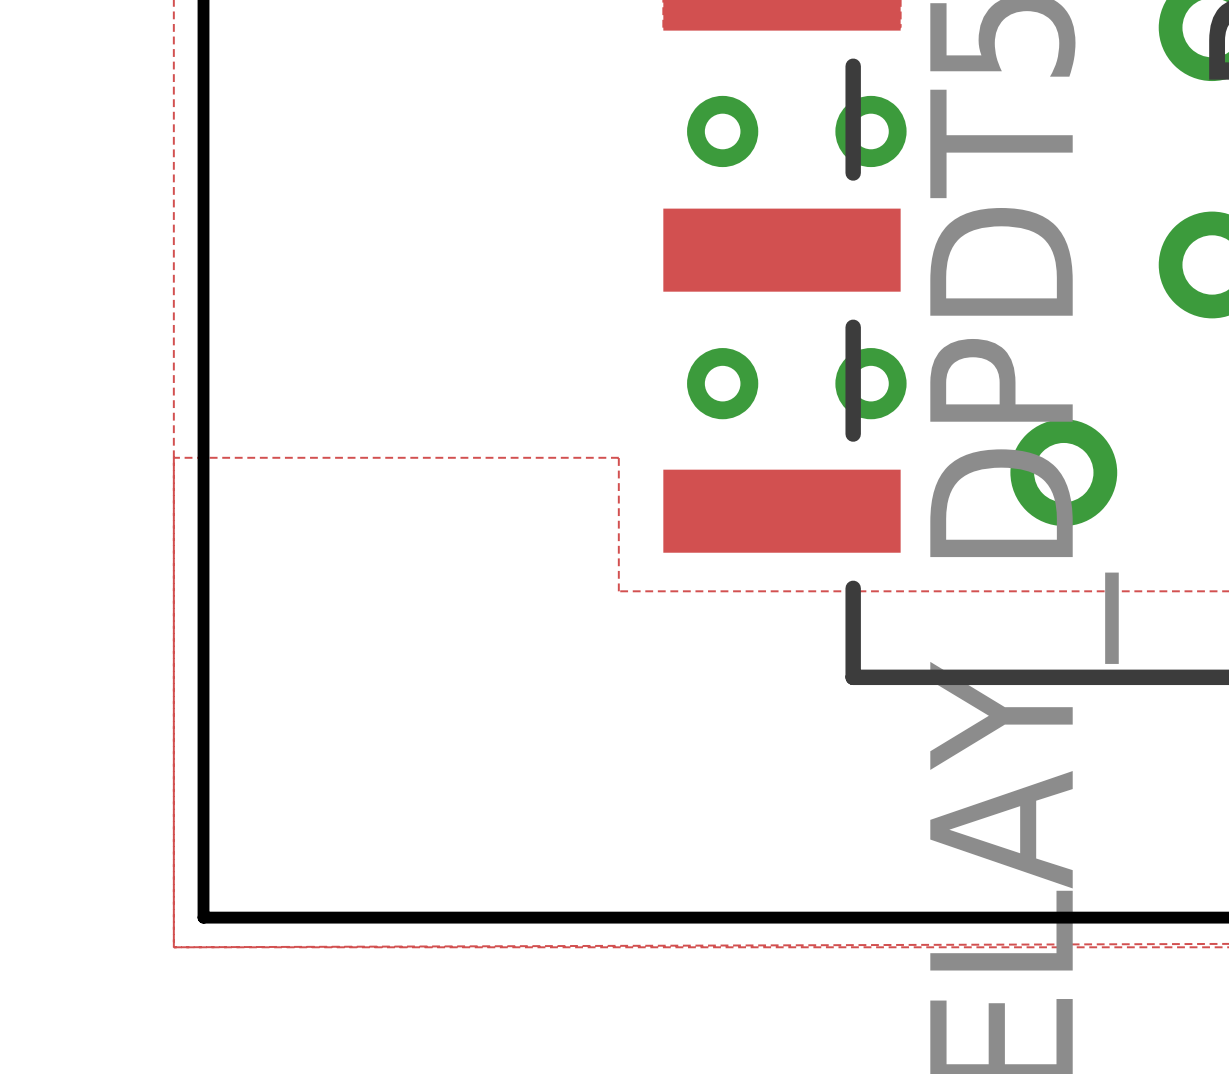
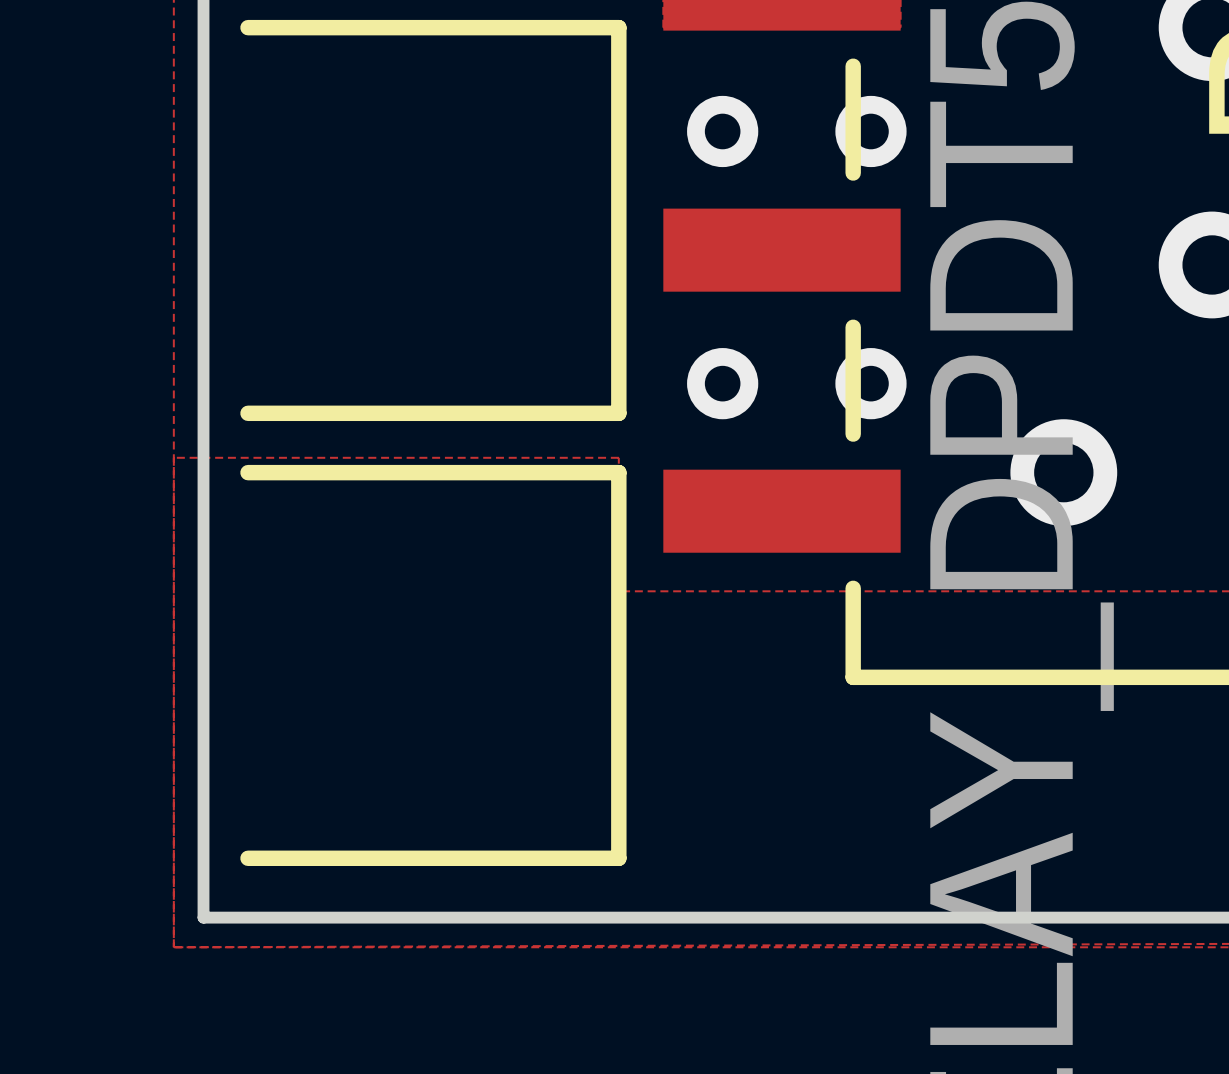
line: none -> (248, 27) (618, 27) (618, 413) (248, 413)
line: none -> (248, 472) (618, 472) (618, 858) (248, 858)

